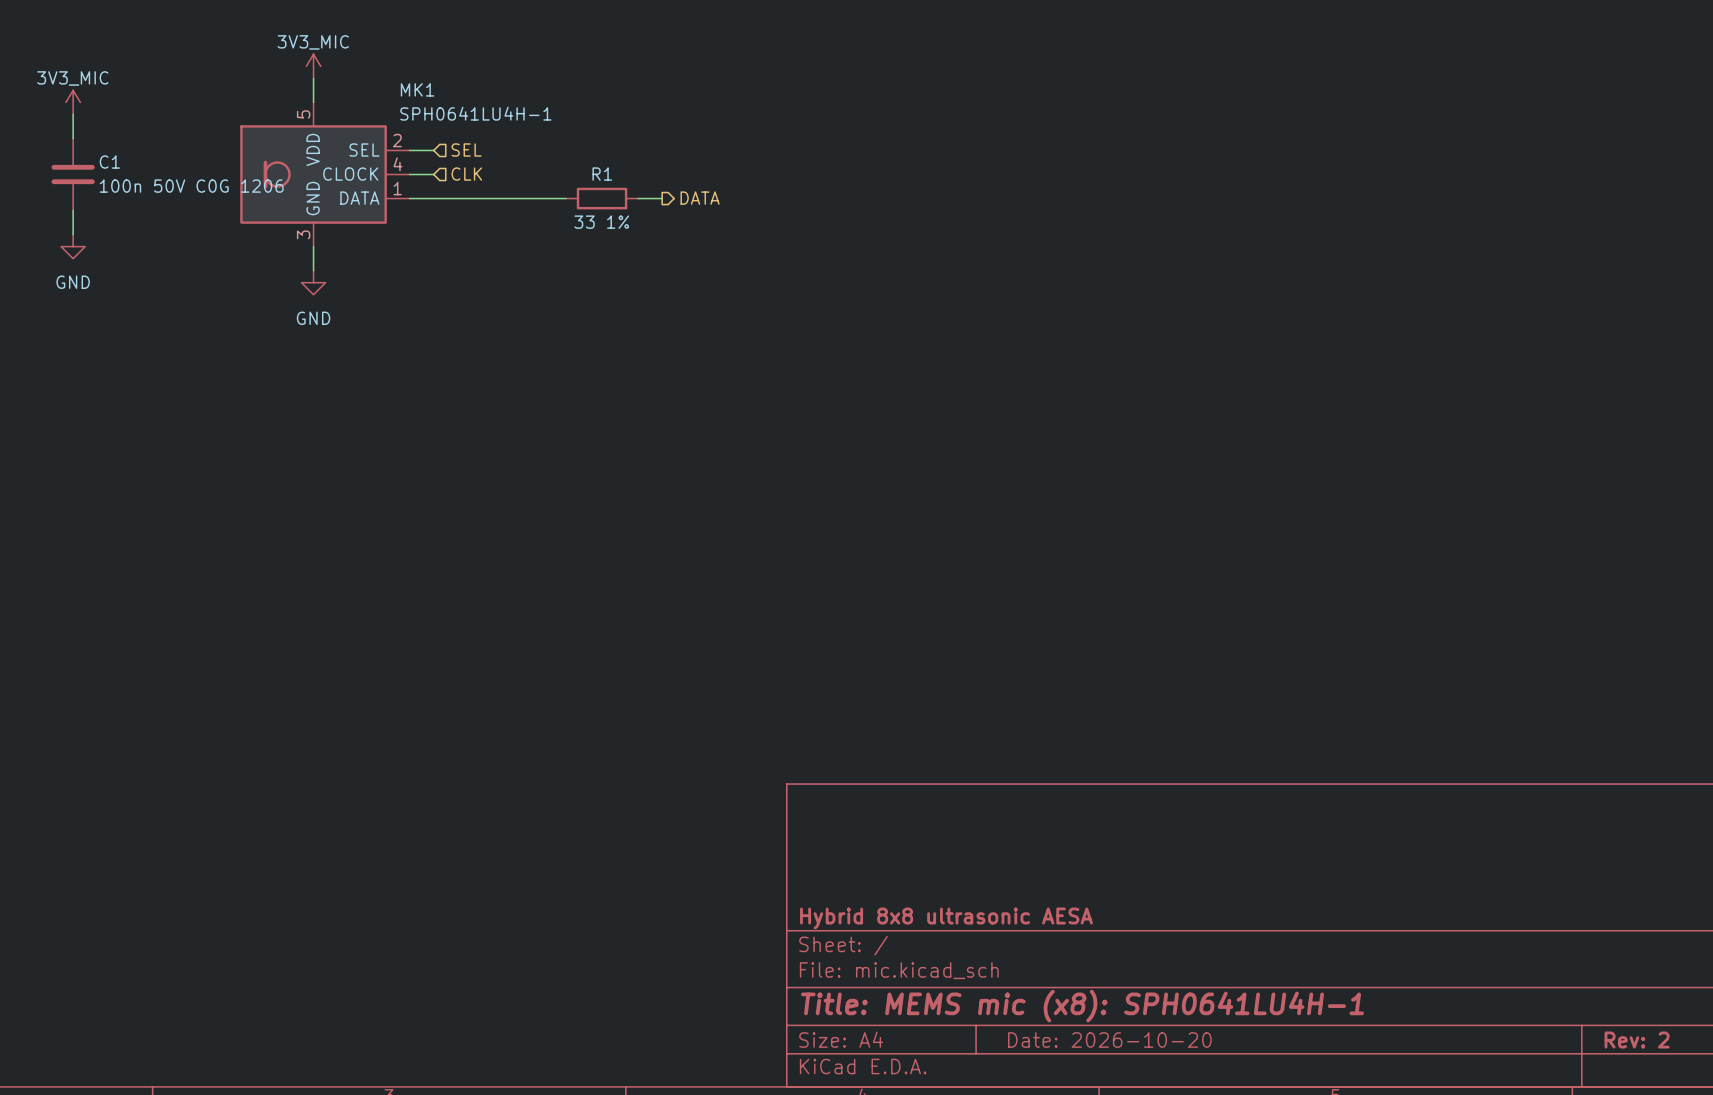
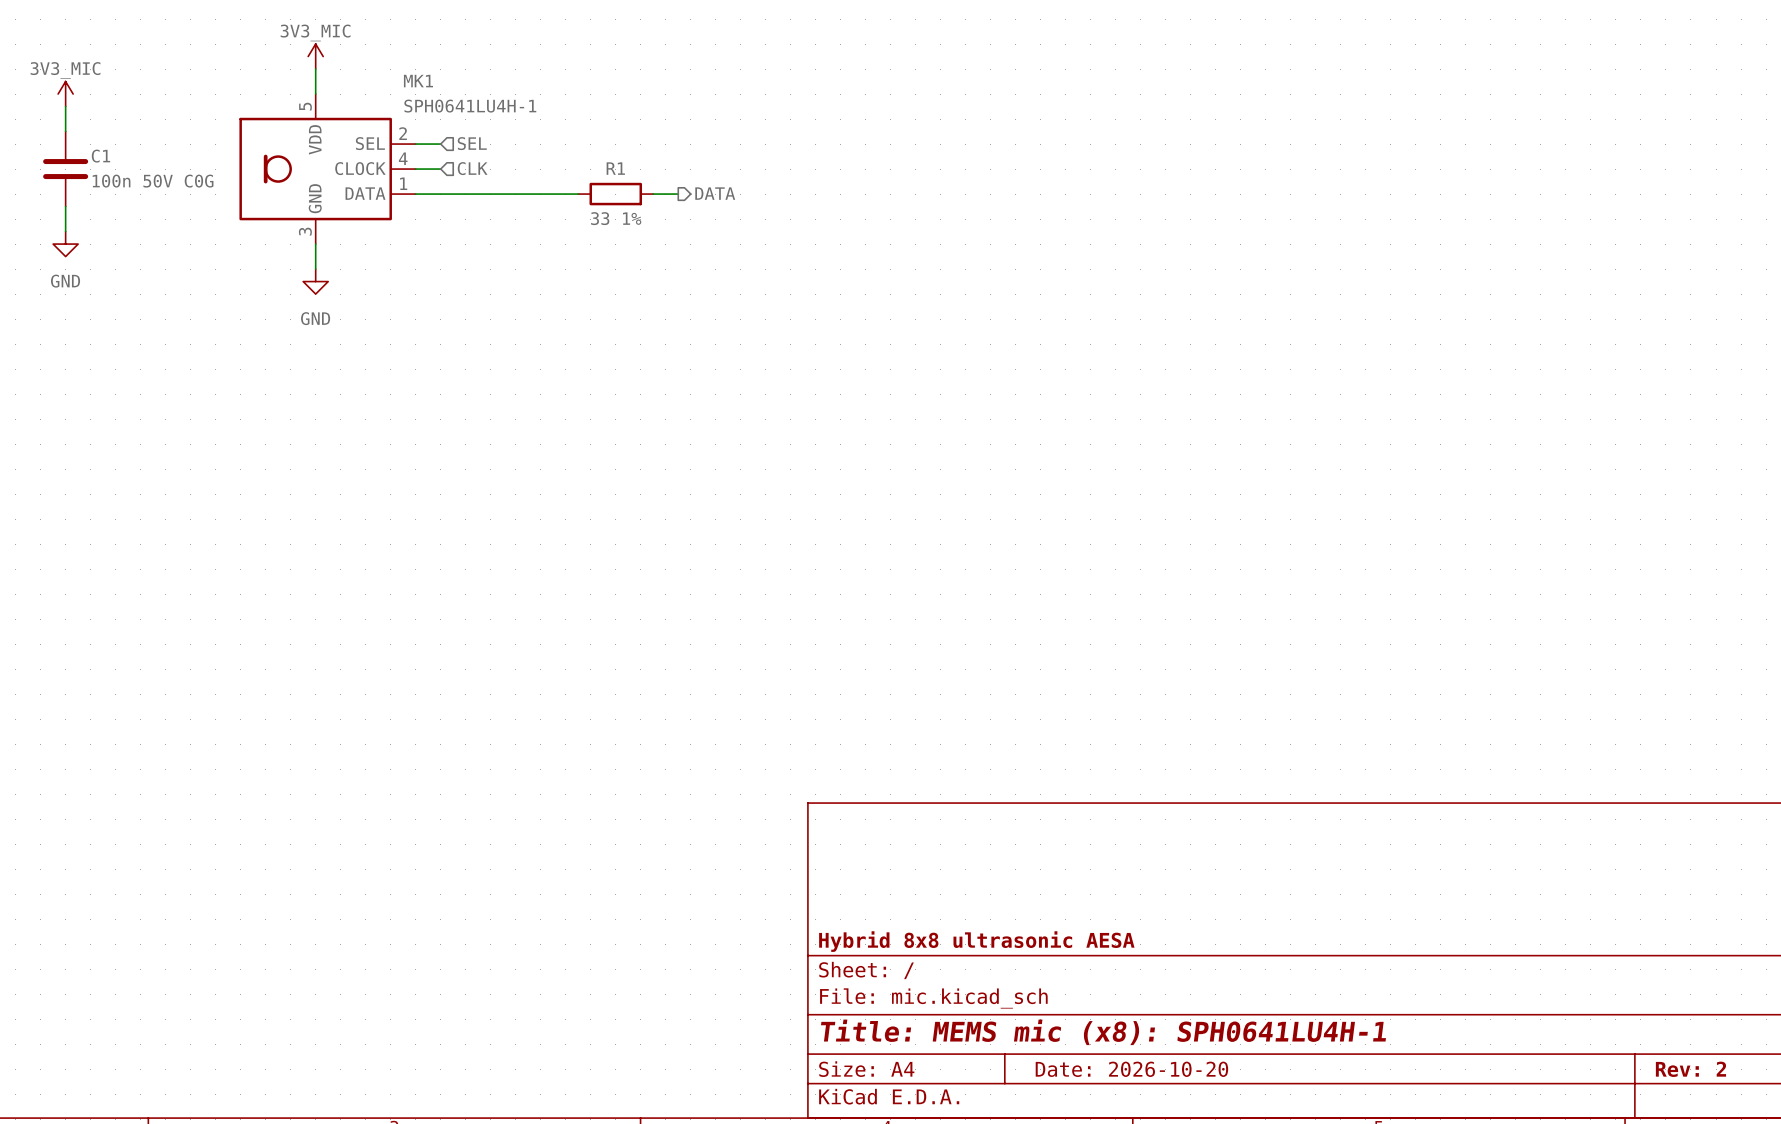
C1 value: 100n 50V C0G 1206 (191, 186) -> 100n 50V C0G (153, 181)

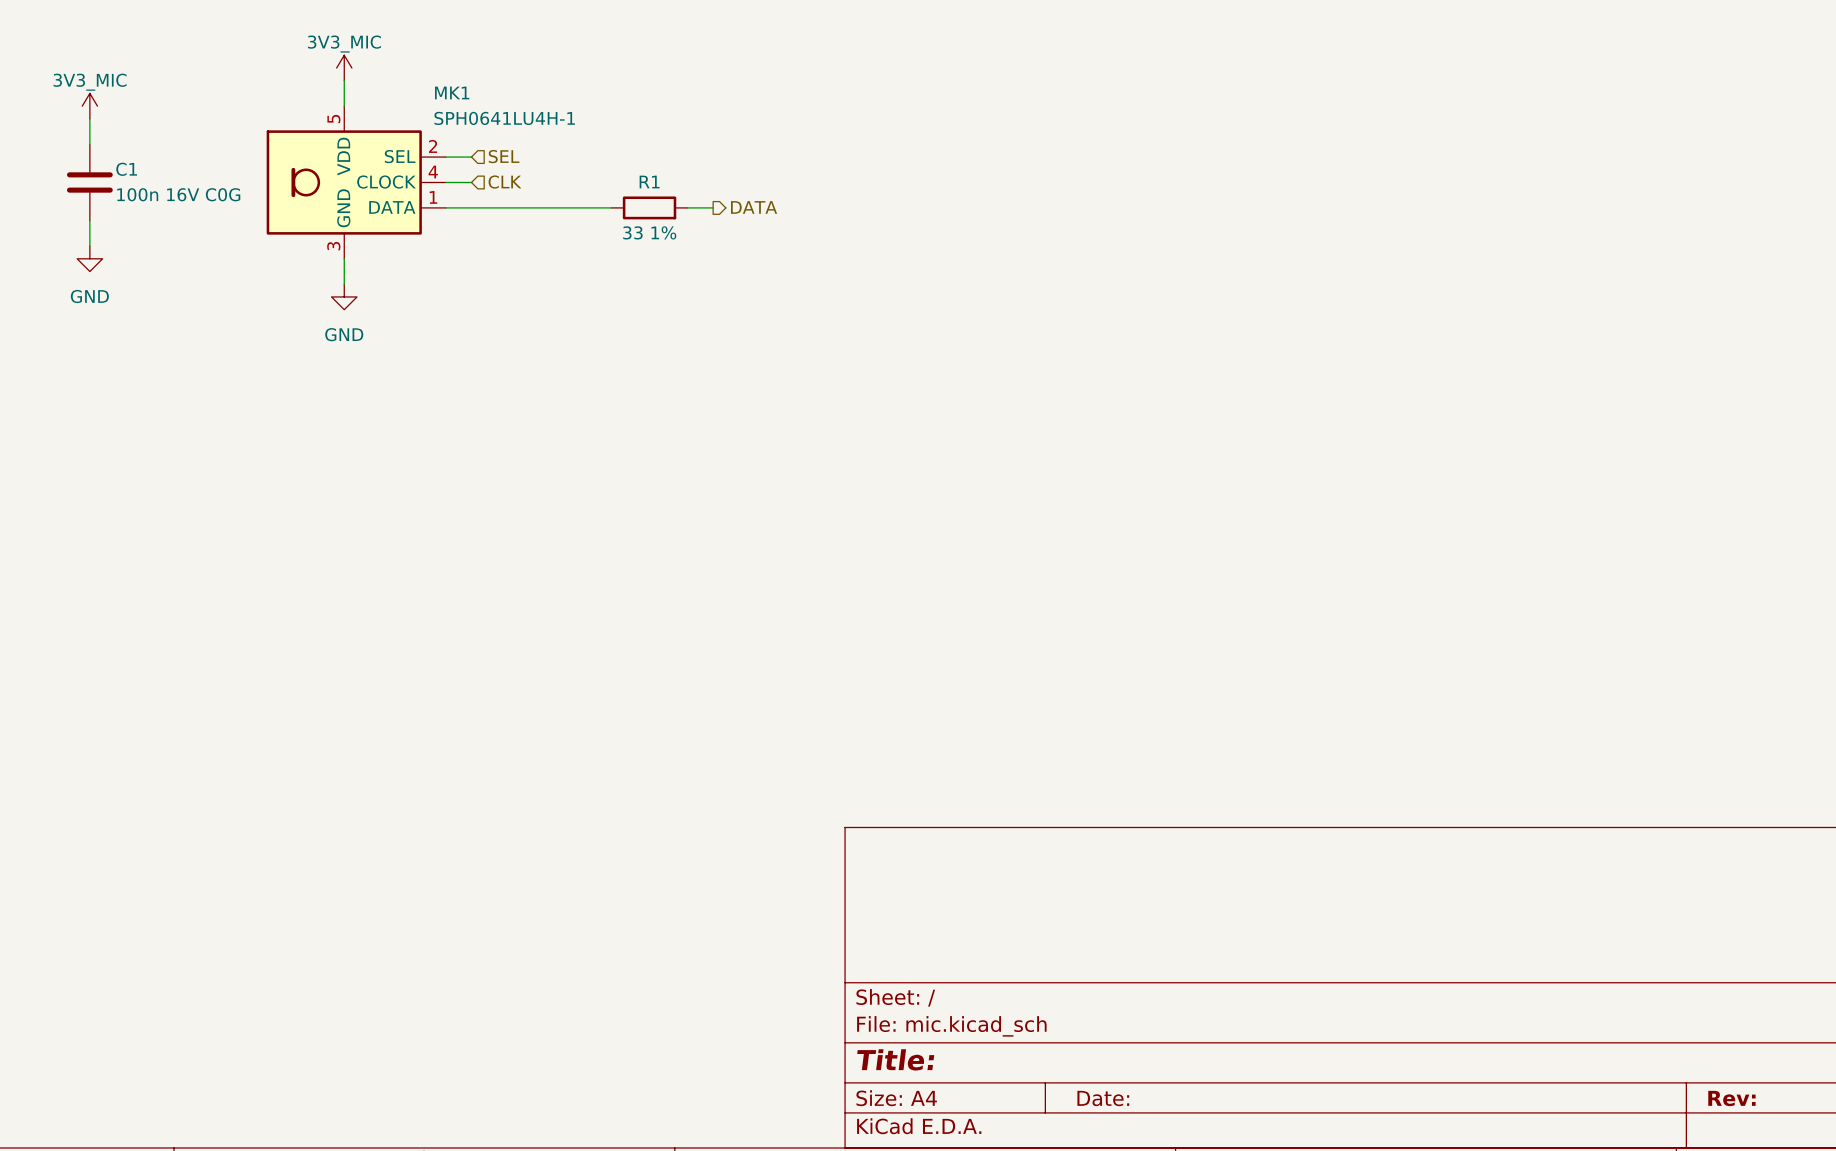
C1 value: 100n 50V C0G (153, 181) -> 100n 16V C0G (178, 194)
title block: Hybrid 8x8 ultrasonic AESA (976, 941) -> none
title block: Title: MEMS mic (x8): SPH0641LU4H-1 (1103, 1032) -> Title: (895, 1059)
title block: Date: 2026-10-20 (1131, 1069) -> Date: (1103, 1098)
title block: Rev: 2 (1690, 1069) -> Rev: (1731, 1098)

